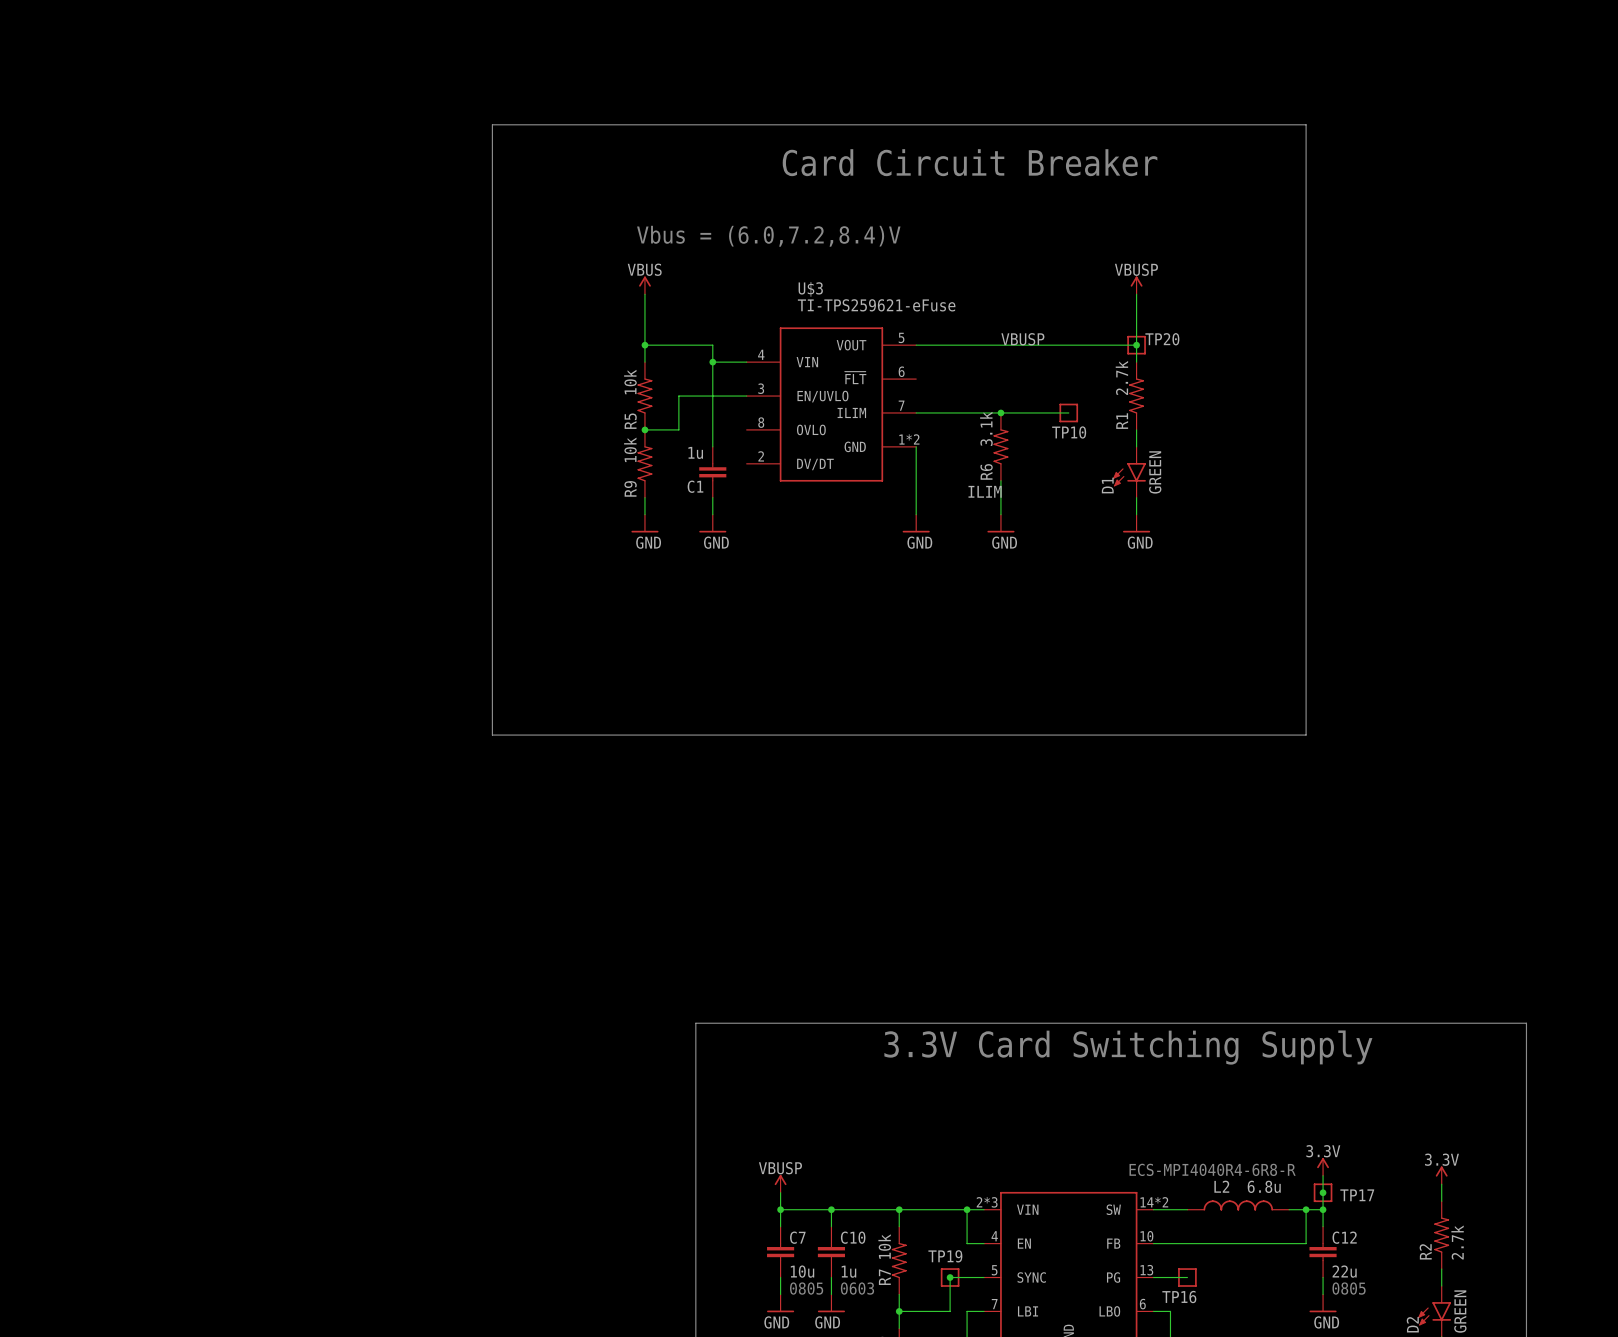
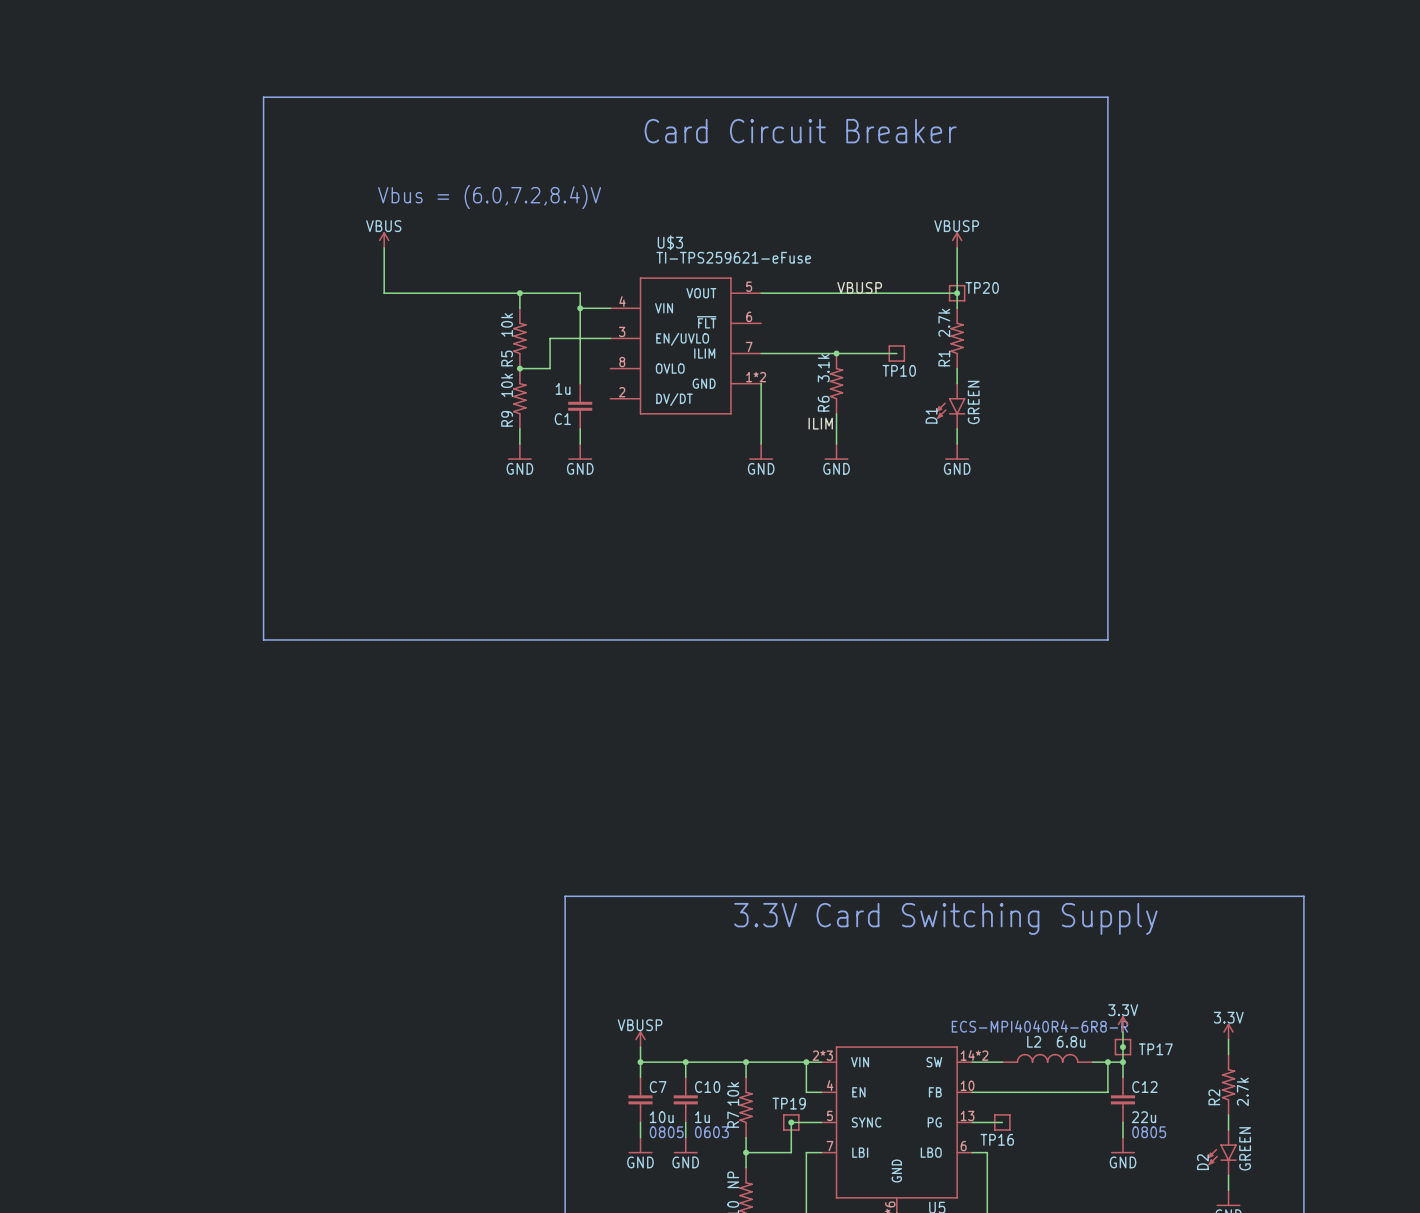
line: (492, 124) (492, 735) -> (384, 97) (263, 97) (263, 639) (384, 639)
text position: Vbus = (6.0,7.2,8.4)V (768, 236) -> Vbus = (6.0,7.2,8.4)V (489, 196)
power symbol position: VBUS (644, 285) -> VBUS (384, 240)
wire: (644, 294) (644, 345) -> (384, 247) (384, 293) (519, 293)

